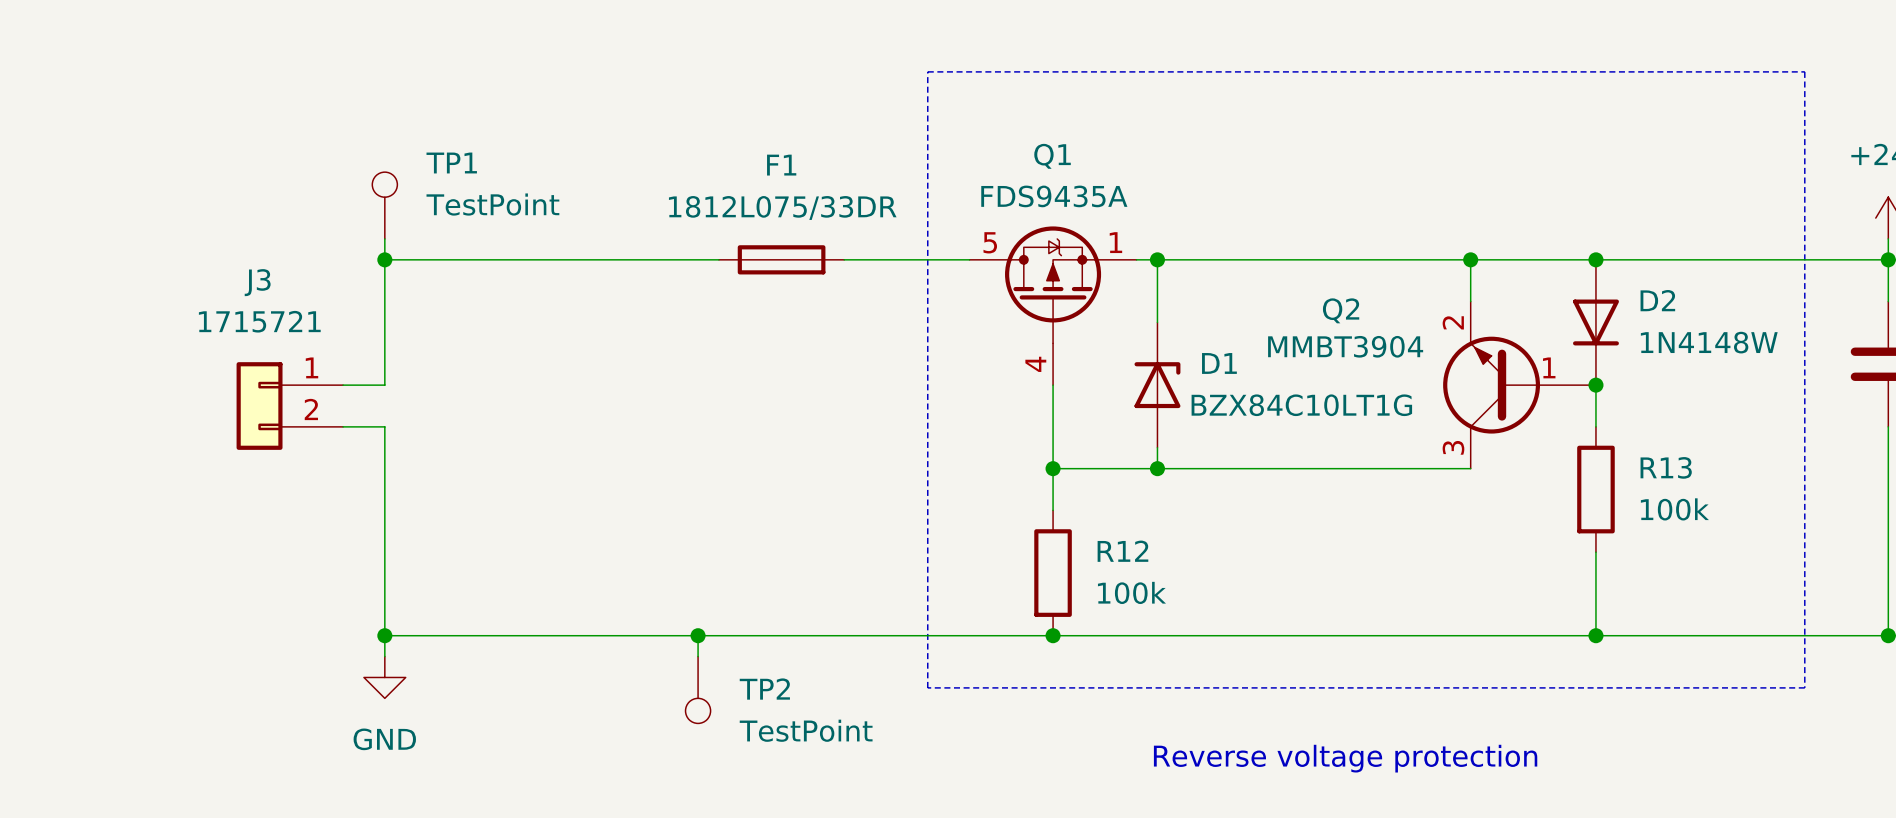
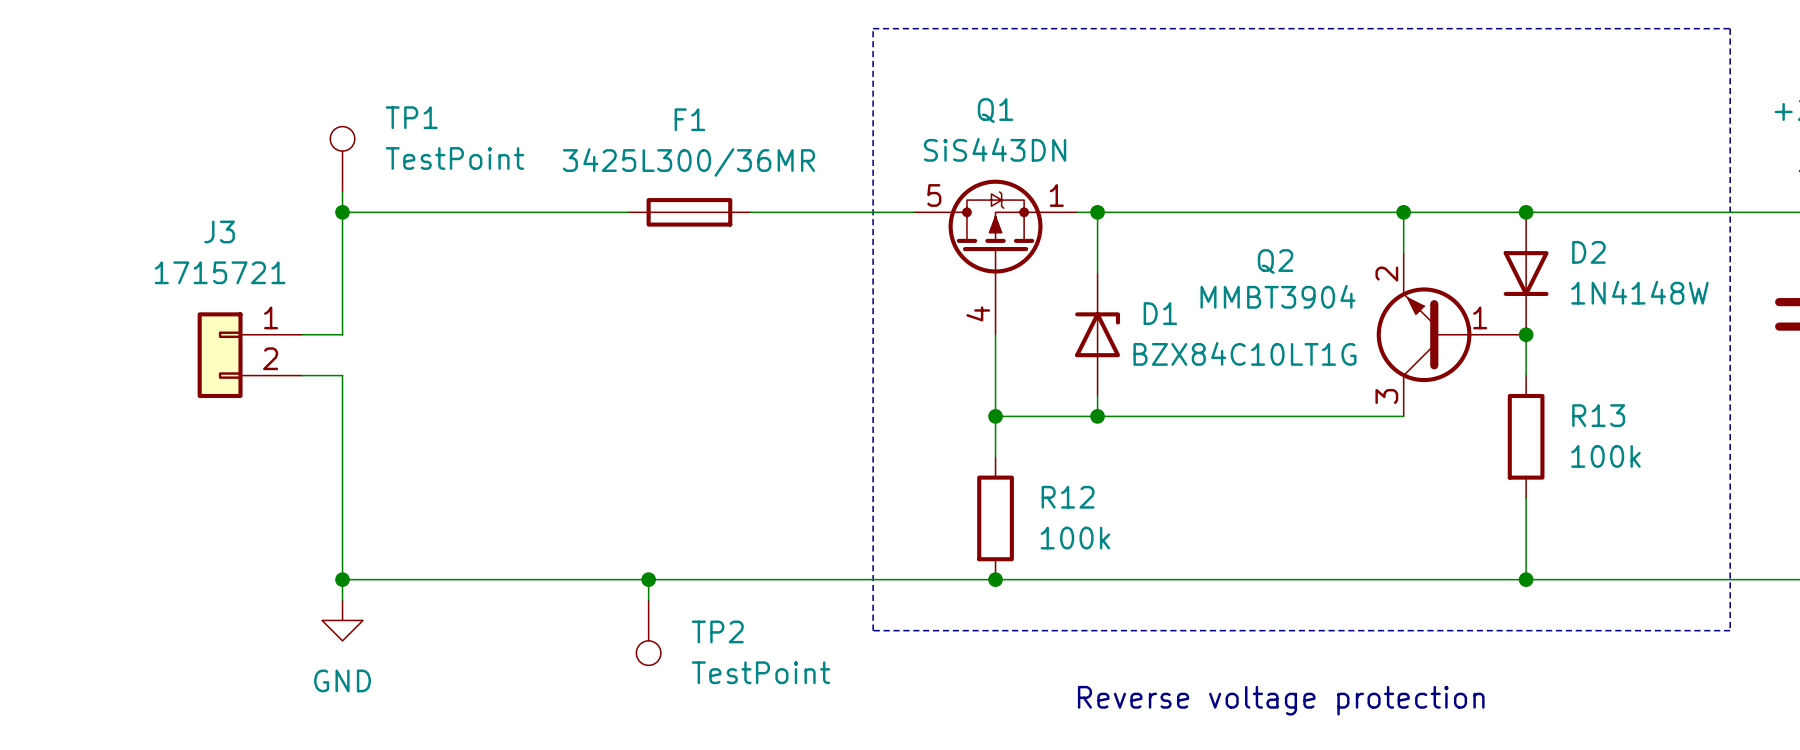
Q1 value: FDS9435A (1054, 196) -> SiS443DN (995, 149)
F1 value: 1812L075/33DR (782, 207) -> 3425L300/36MR (688, 162)
F1 position: (781, 259) -> (689, 212)

